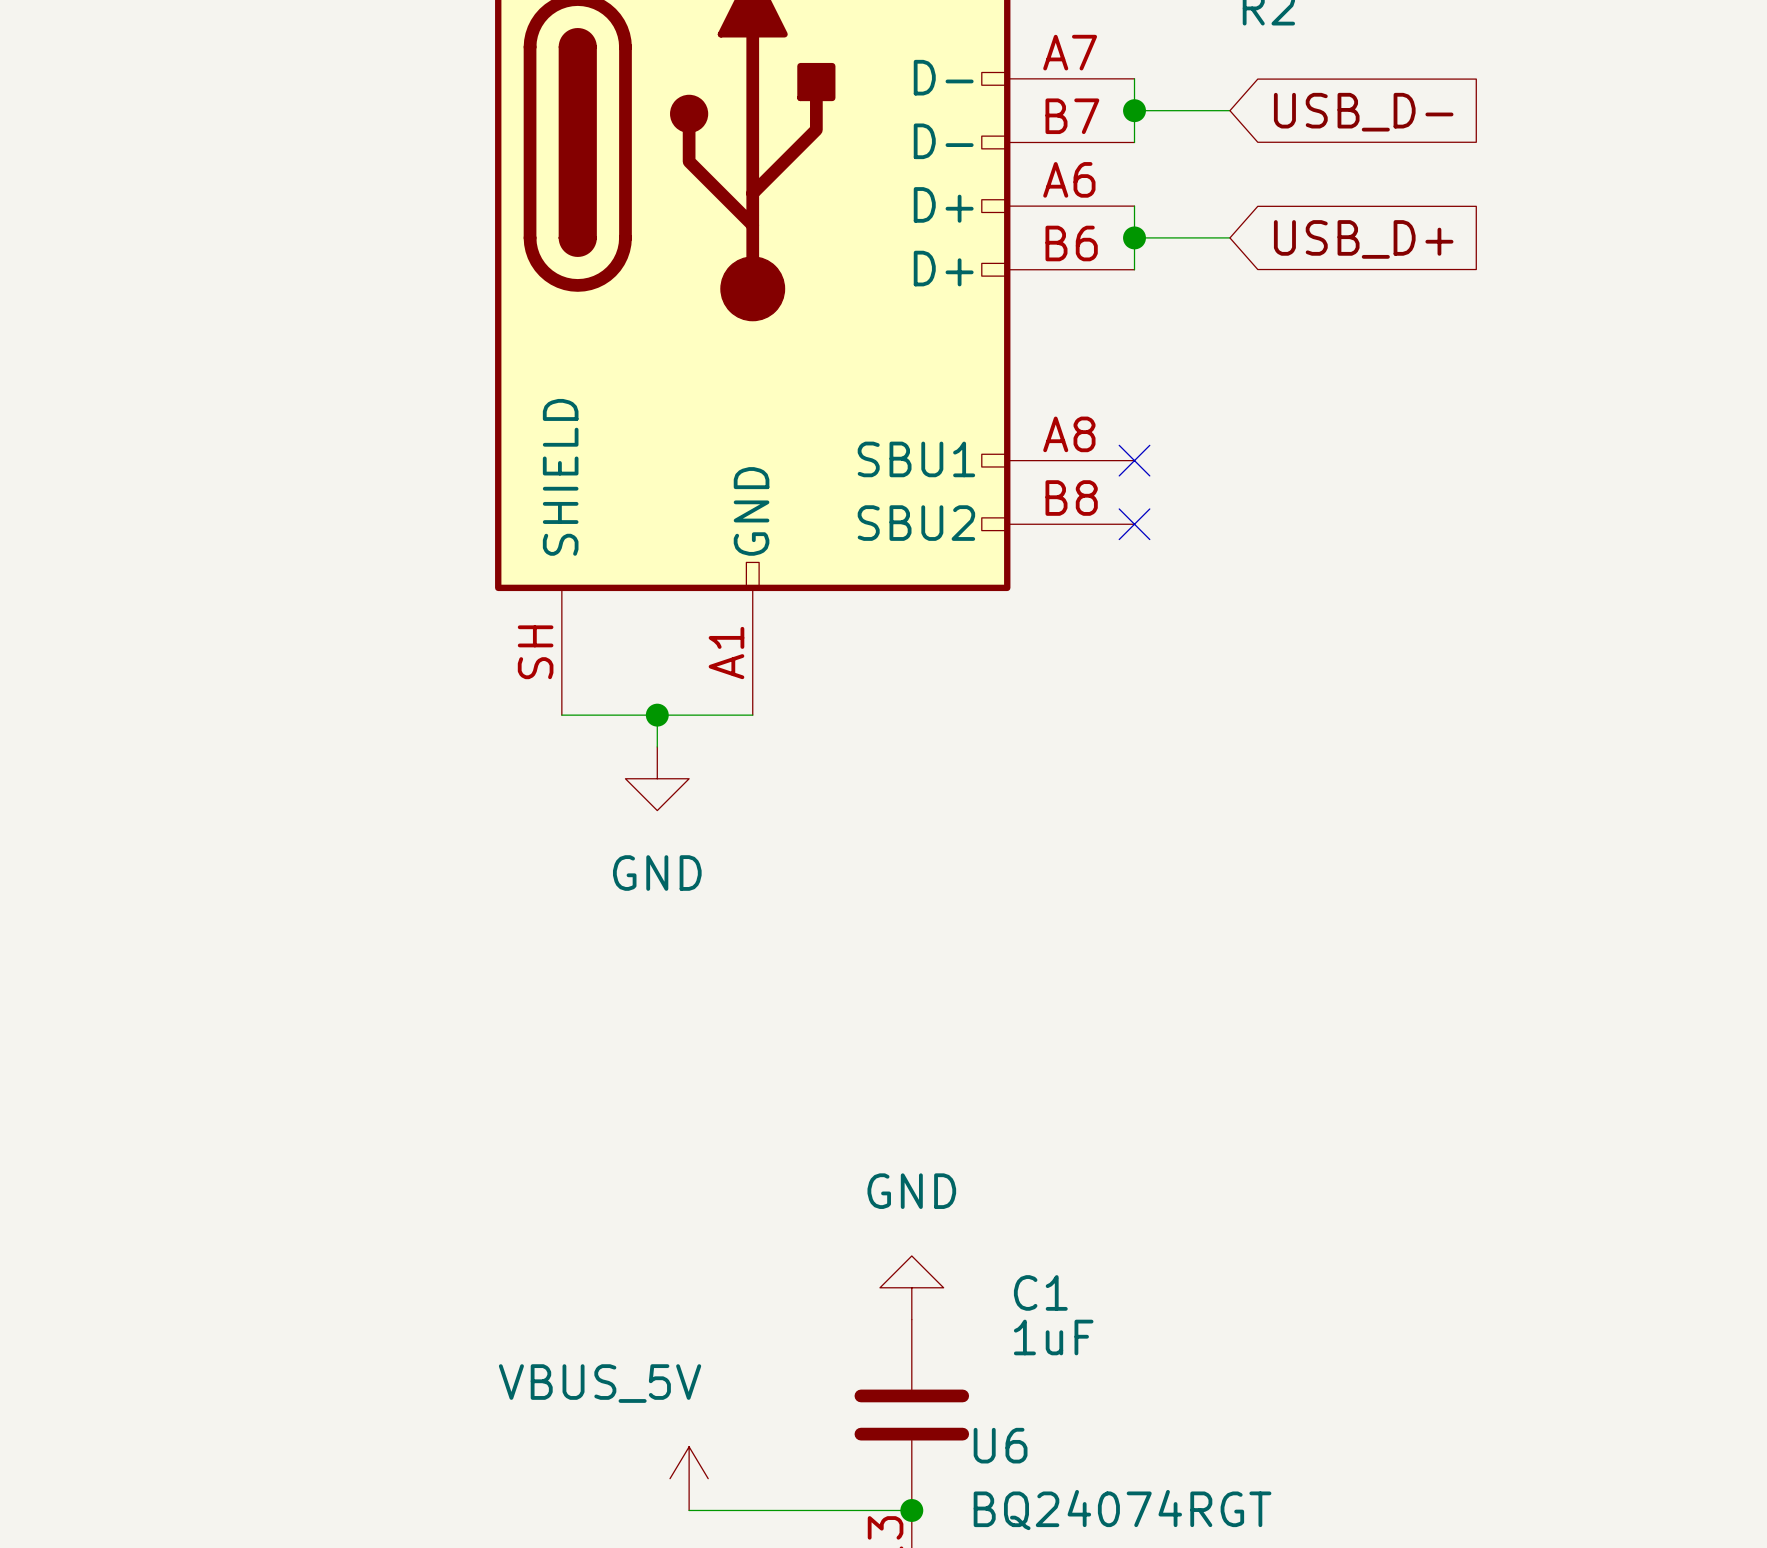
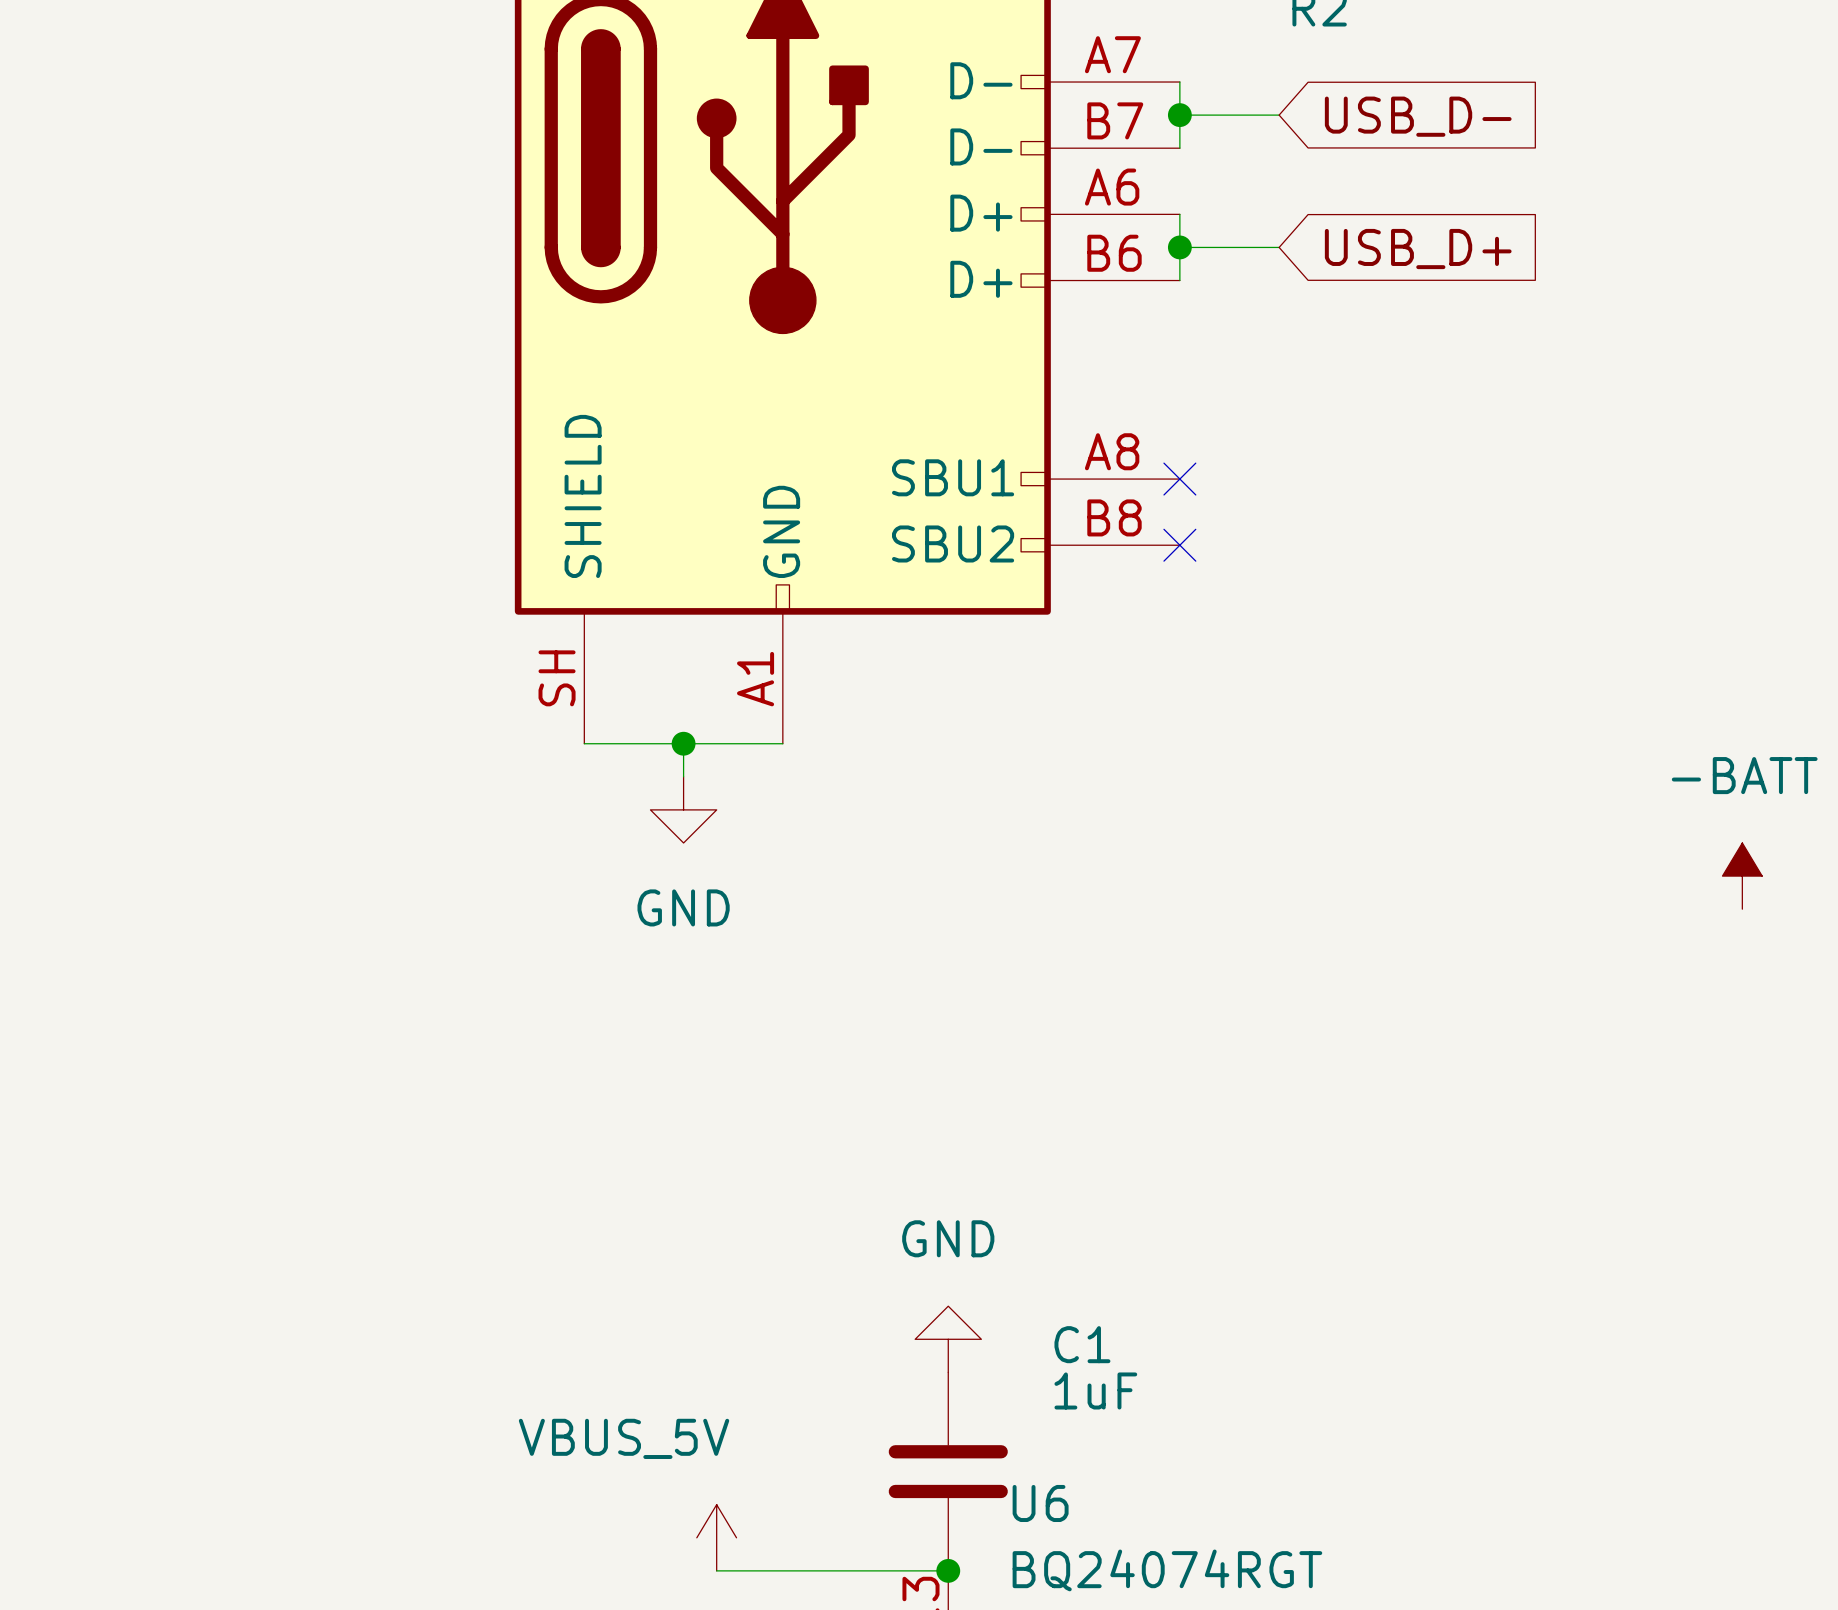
power symbol: none -> -BATT (1742, 876)

